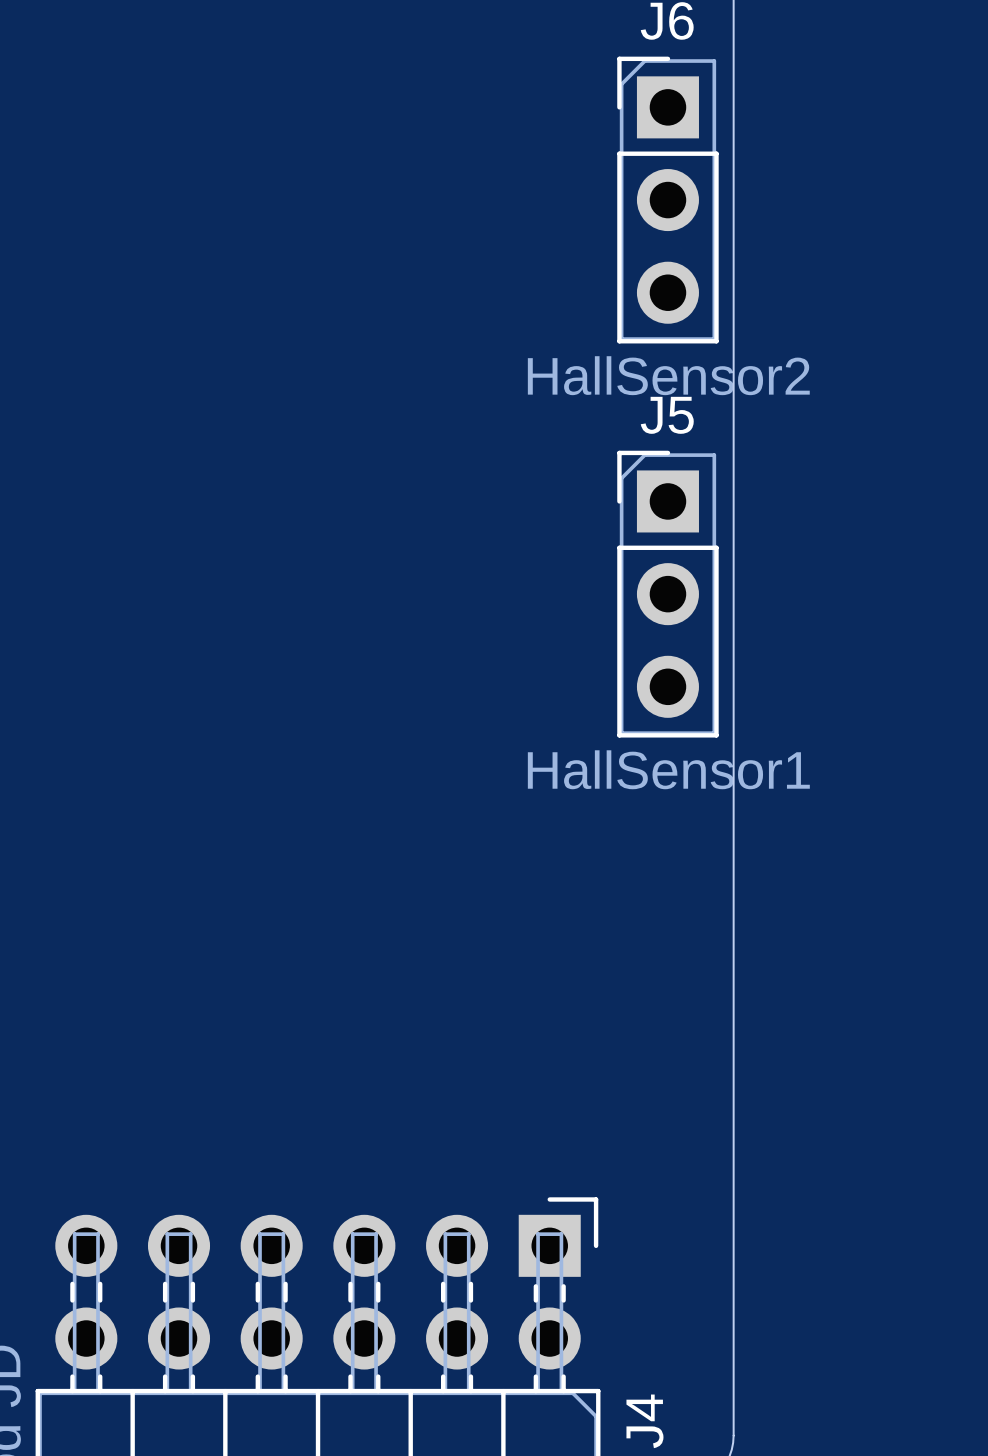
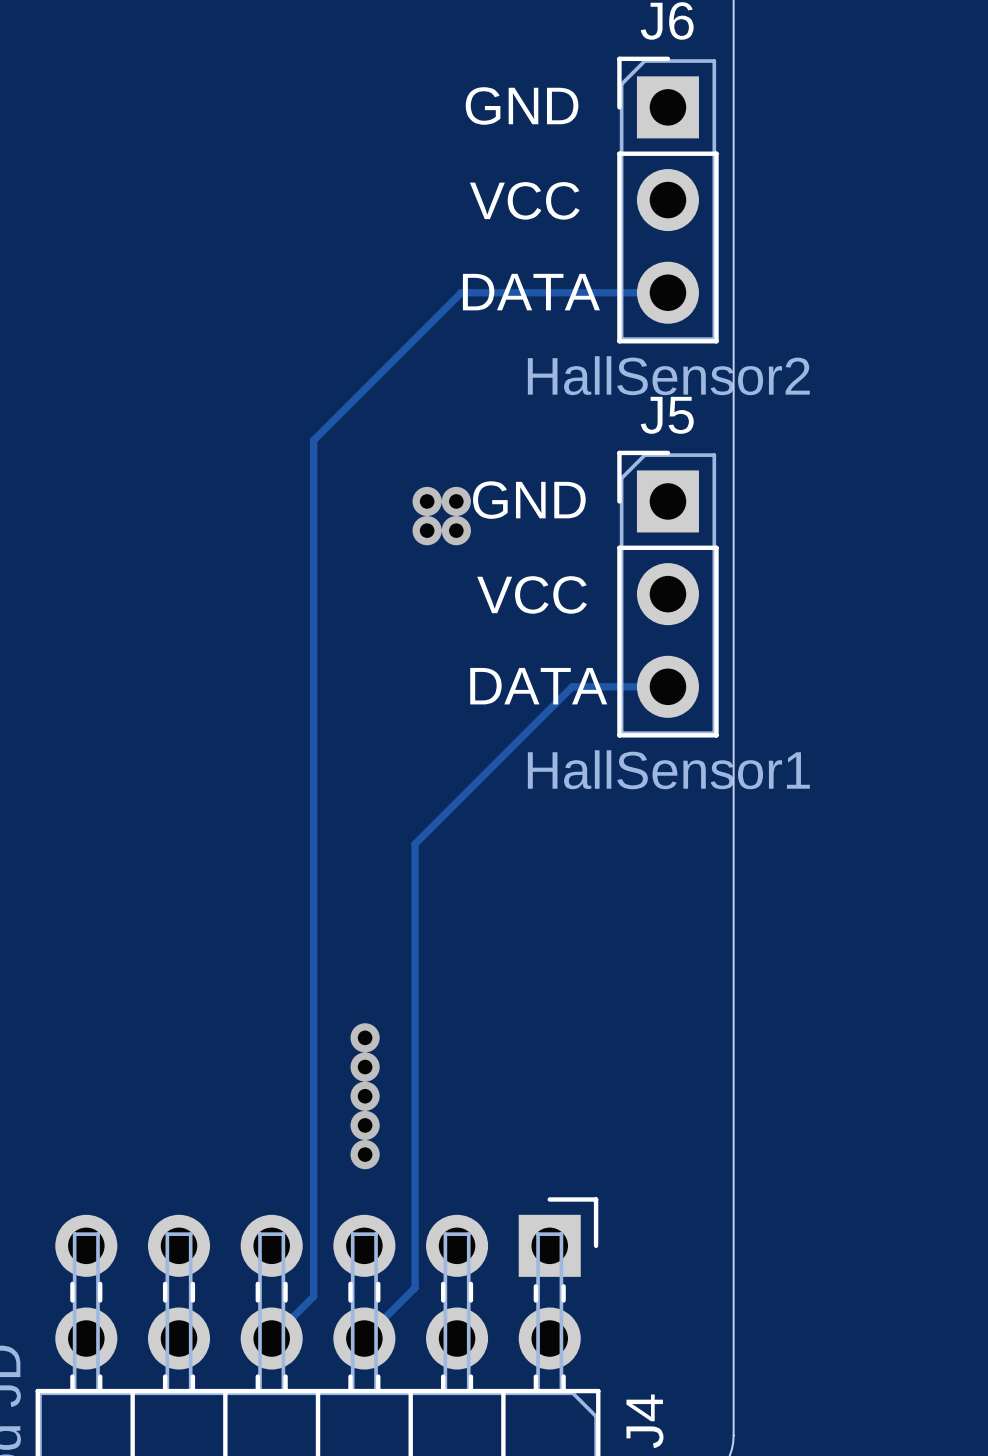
text: none -> GND (522, 105)
text: none -> VCC (524, 200)
text: none -> DATA (531, 292)
track: none -> (667, 292) (461, 292) (313, 440) (313, 1296) (271, 1338)
text: none -> GND (529, 500)
via: none -> (427, 501)
via: none -> (456, 501)
via: none -> (427, 530)
via: none -> (456, 530)
text: none -> VCC (532, 594)
text: none -> DATA (538, 686)
track: none -> (667, 686) (572, 686) (415, 844) (415, 1287) (364, 1338)
via: none -> (365, 1037)
via: none -> (365, 1067)
via: none -> (365, 1096)
via: none -> (365, 1125)
via: none -> (365, 1154)

